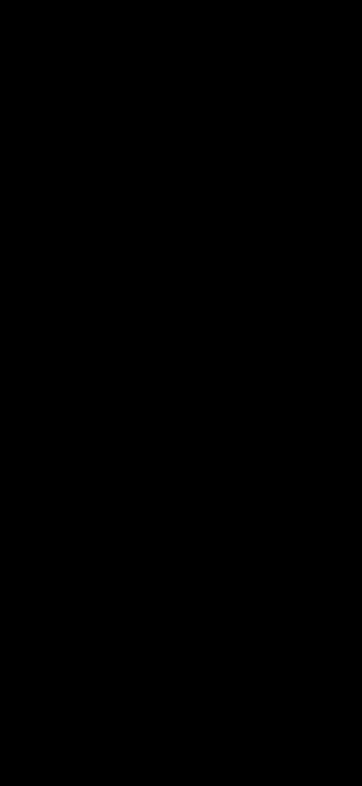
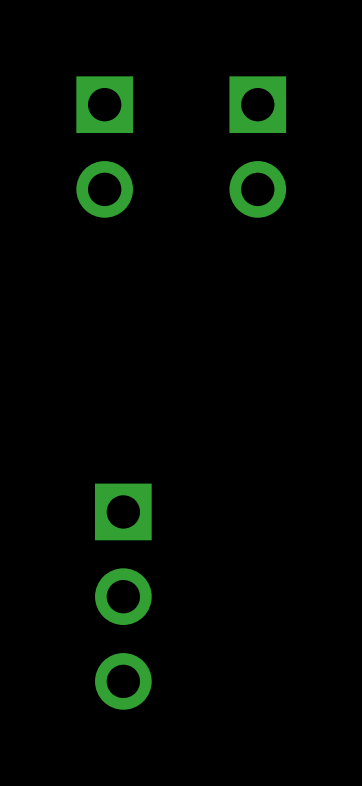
part: none -> (104, 147)
part: none -> (257, 147)
part: none -> (123, 596)

